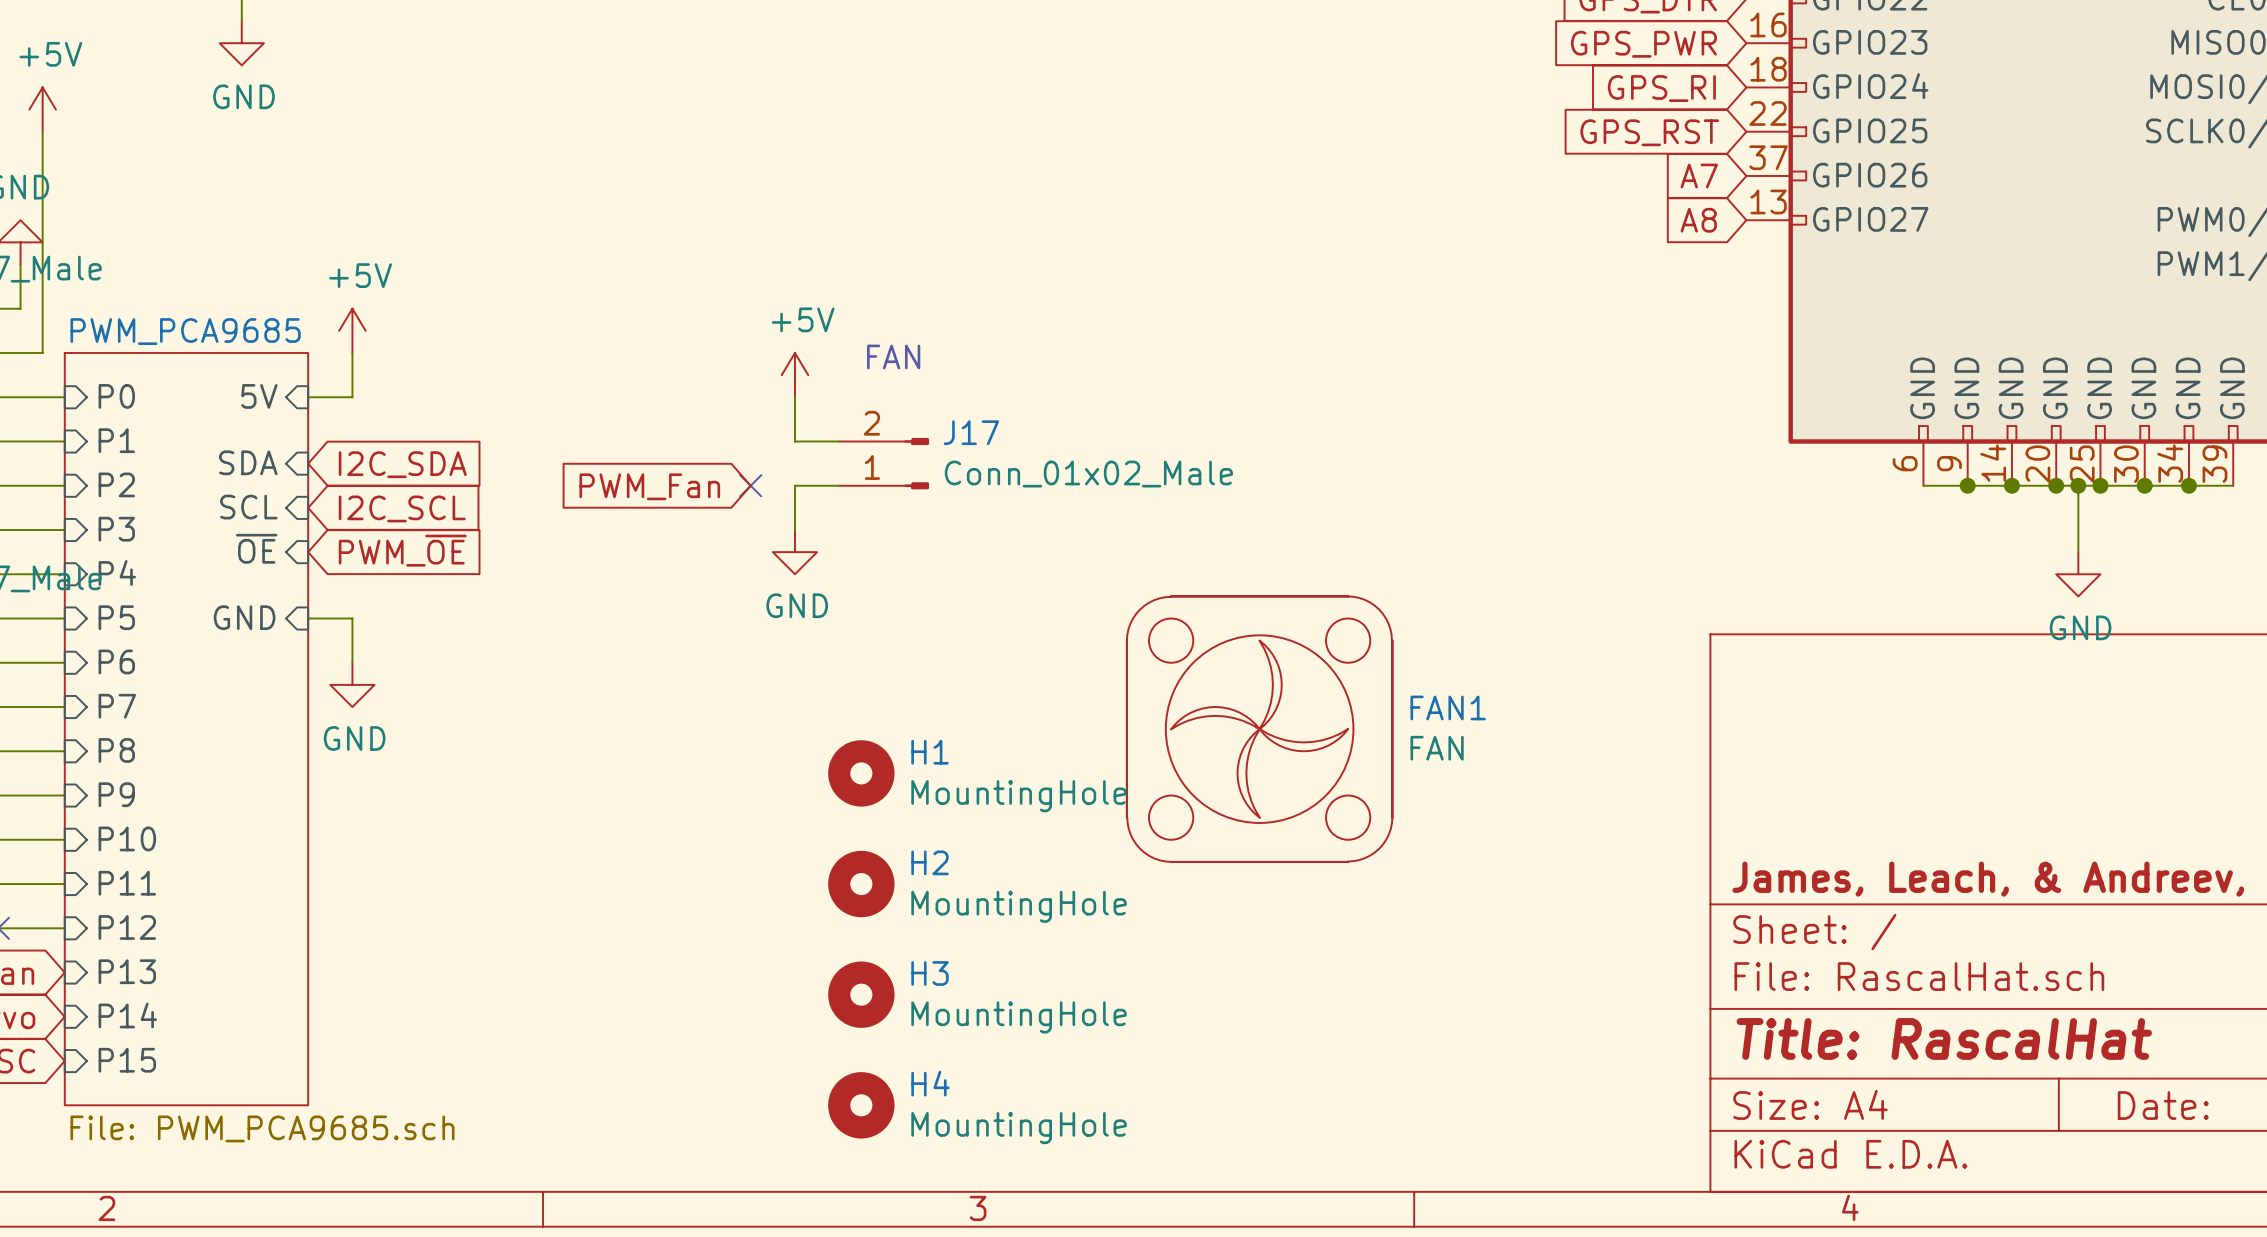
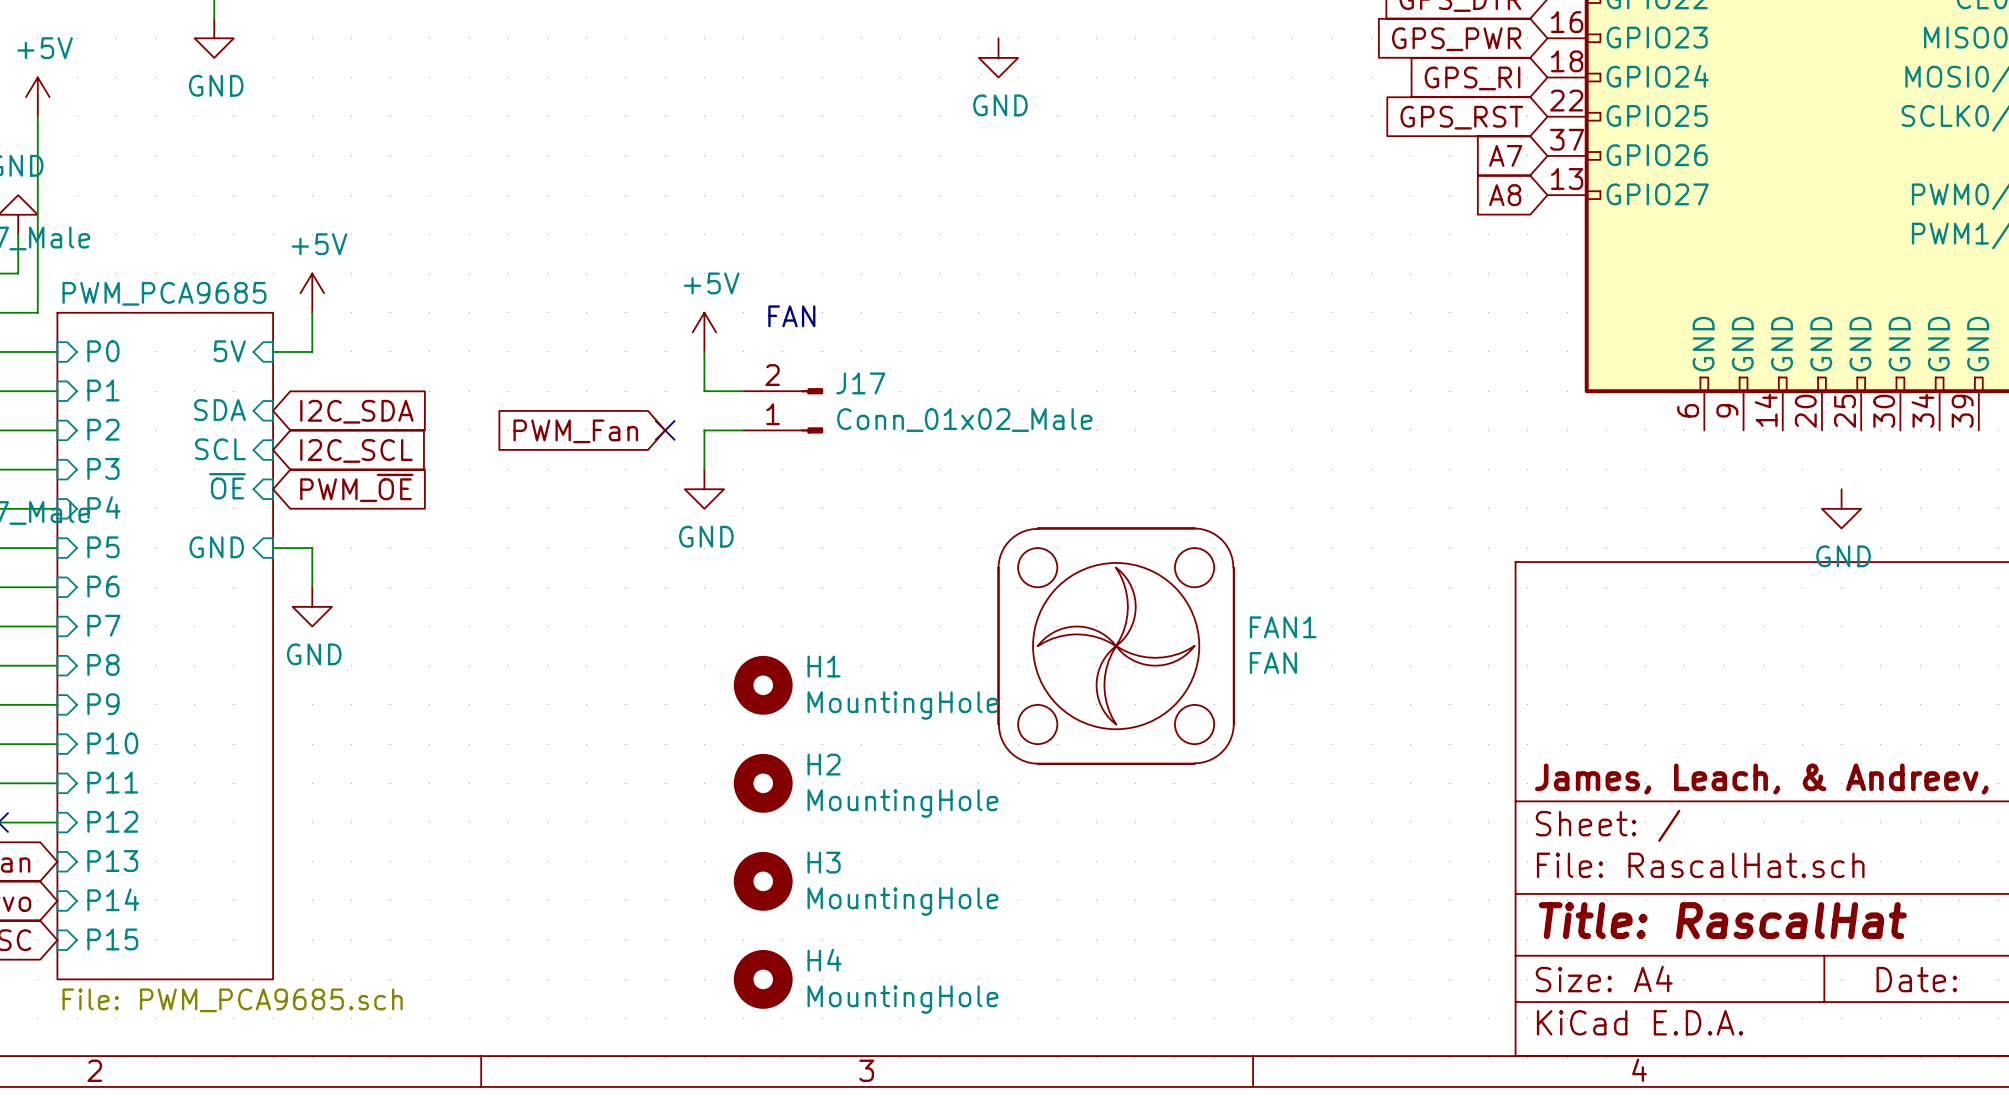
power symbol: none -> GND (998, 57)
wire: (1923, 485) (2233, 485) -> none
junction: (1967, 485) -> none
junction: (2011, 485) -> none
junction: (2056, 485) -> none
wire: (2078, 485) (2078, 552) -> none
junction: (2078, 485) -> none
junction: (2100, 485) -> none
junction: (2144, 485) -> none
junction: (2188, 485) -> none

